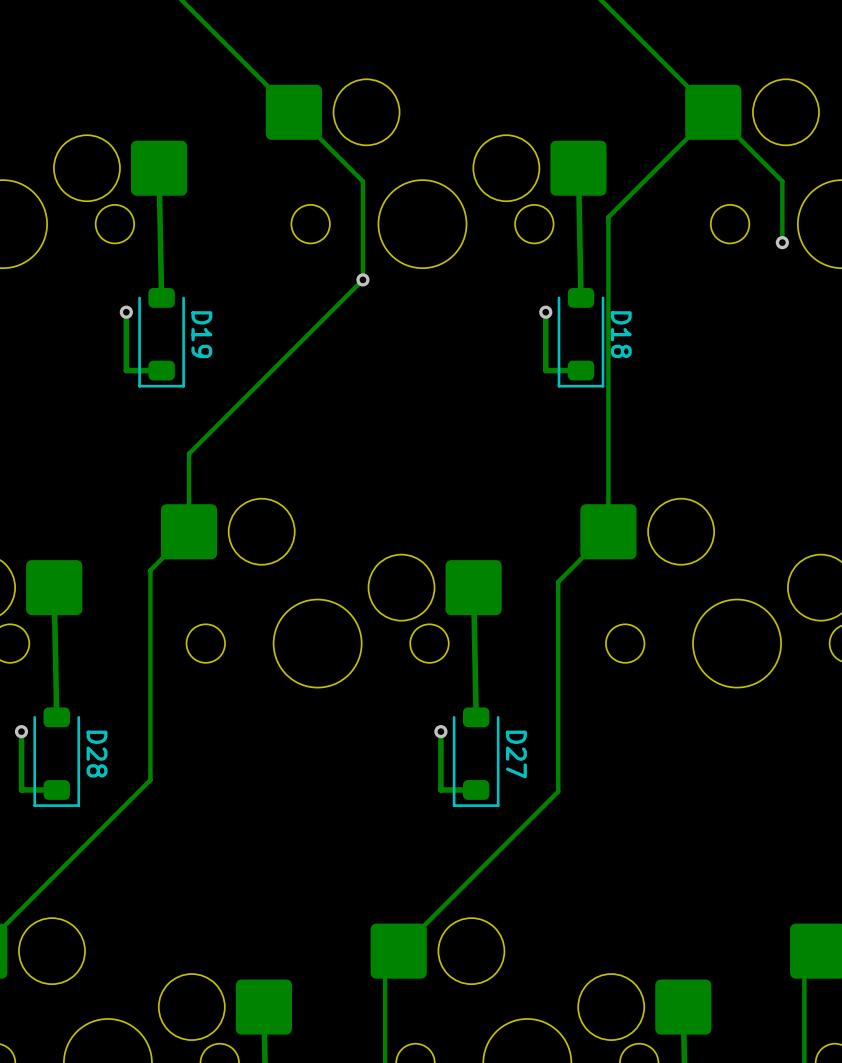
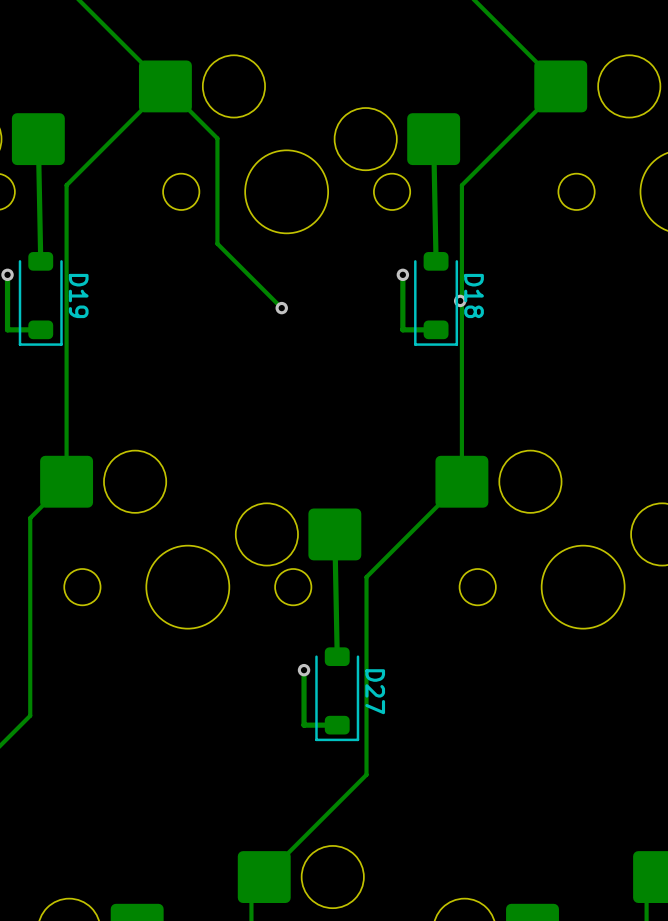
track: (713, 112) (782, 181) (782, 242) -> none
track: (349, 167) (362, 181) (362, 279) (189, 453) -> (165, 86) (66, 185) (66, 408)
track: none -> (217, 138) (217, 243) (281, 308)
via: (782, 242) -> none
via position: (362, 279) -> (281, 308)
via: none -> (460, 300)
track: (558, 581) (558, 791) (507, 842) -> (414, 529) (366, 577) (366, 774)

